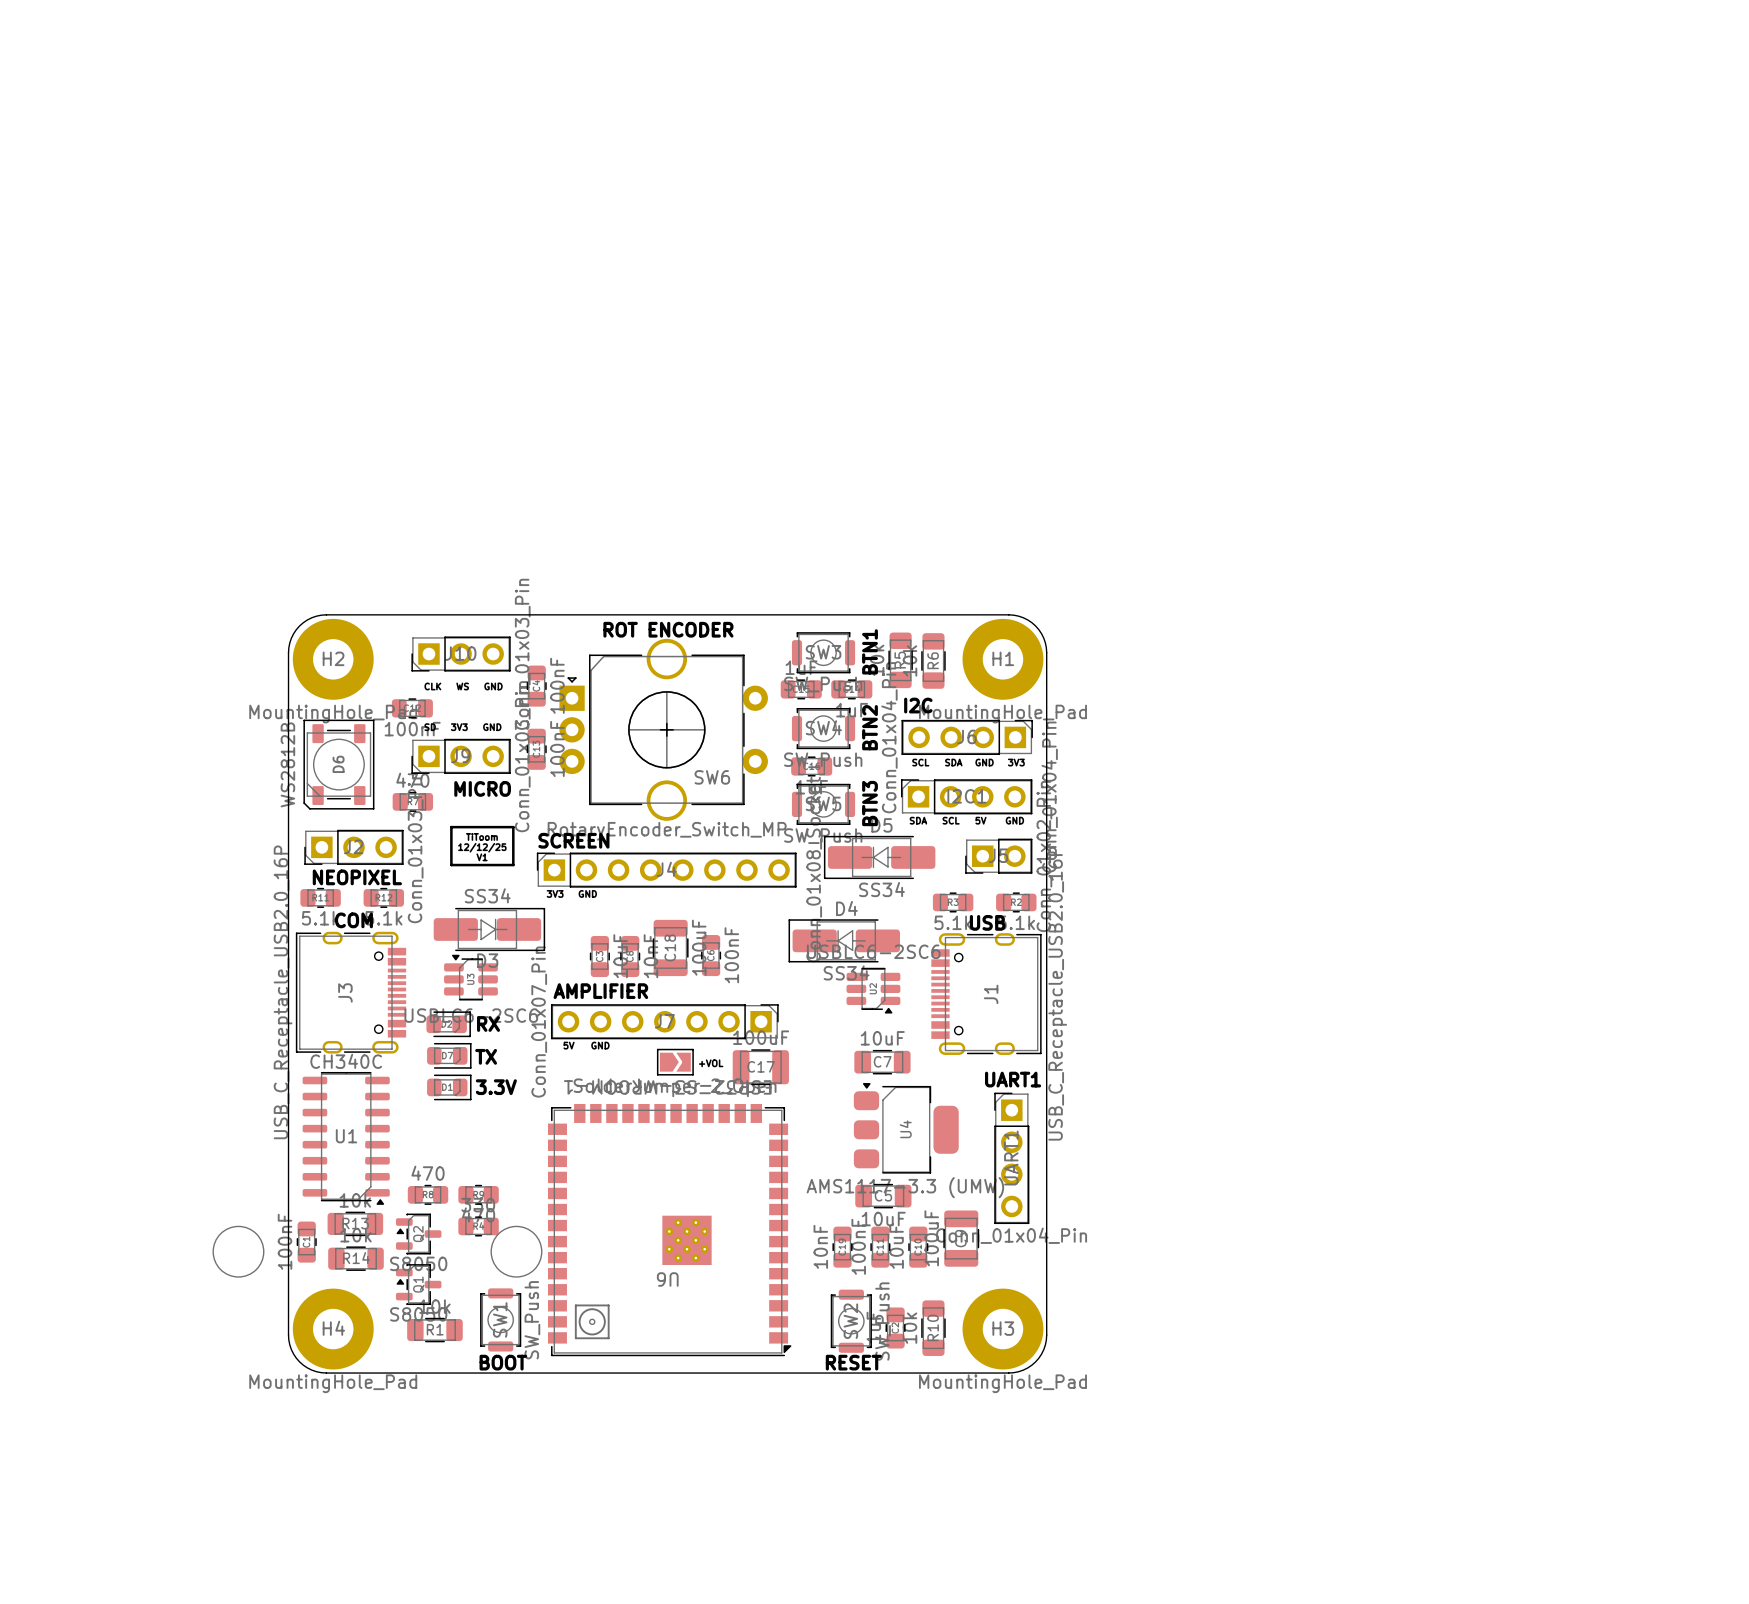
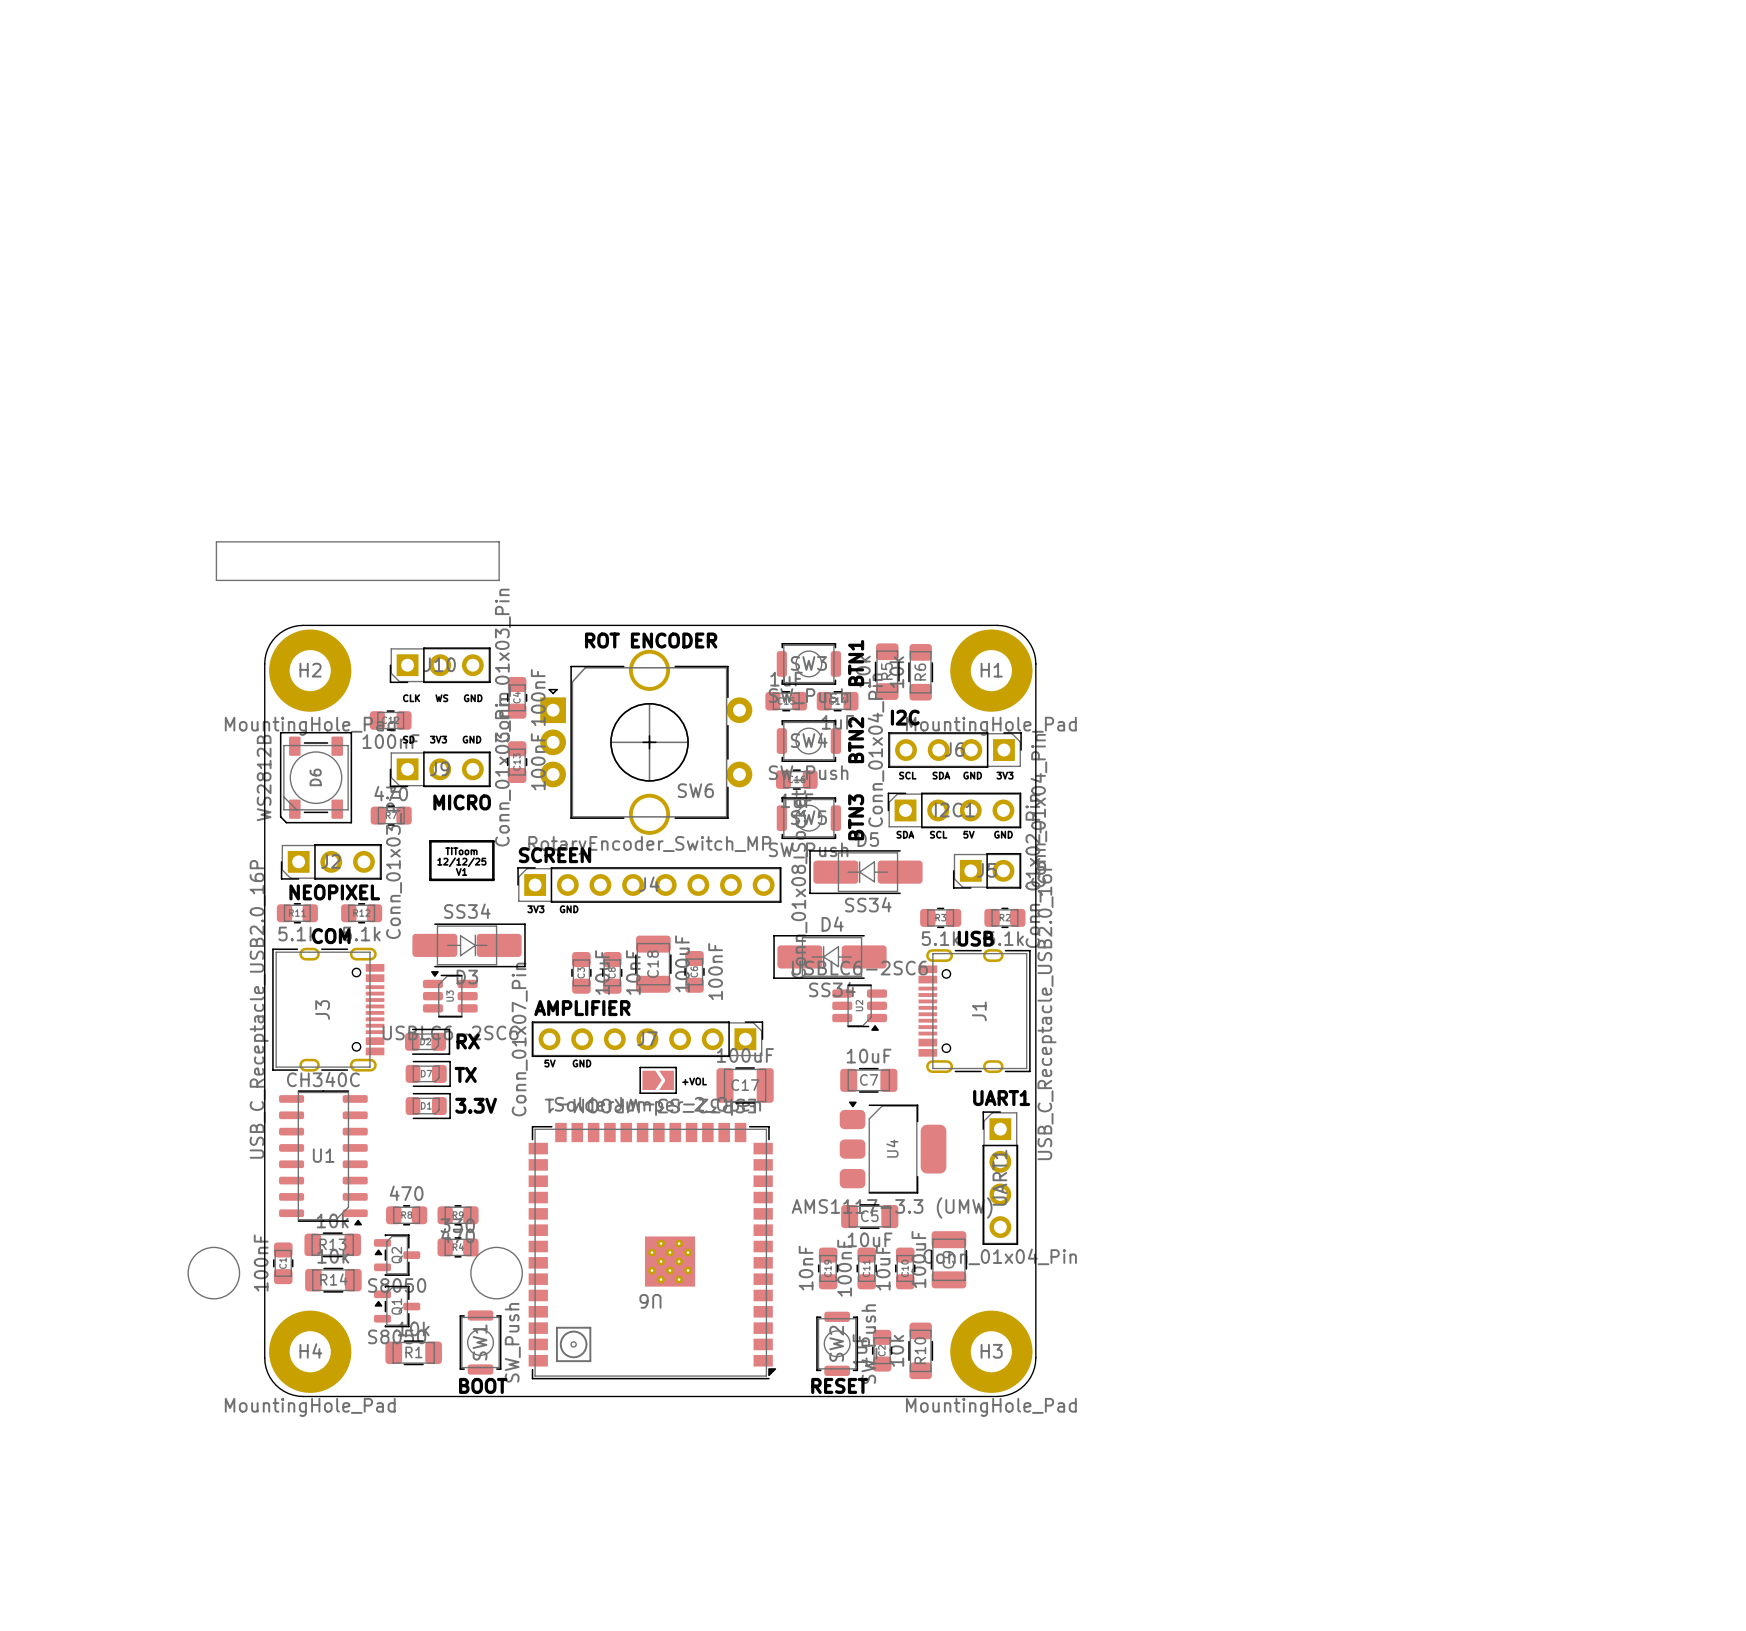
line: none -> (216, 541) (499, 541) (499, 580) (216, 580) (216, 541)

